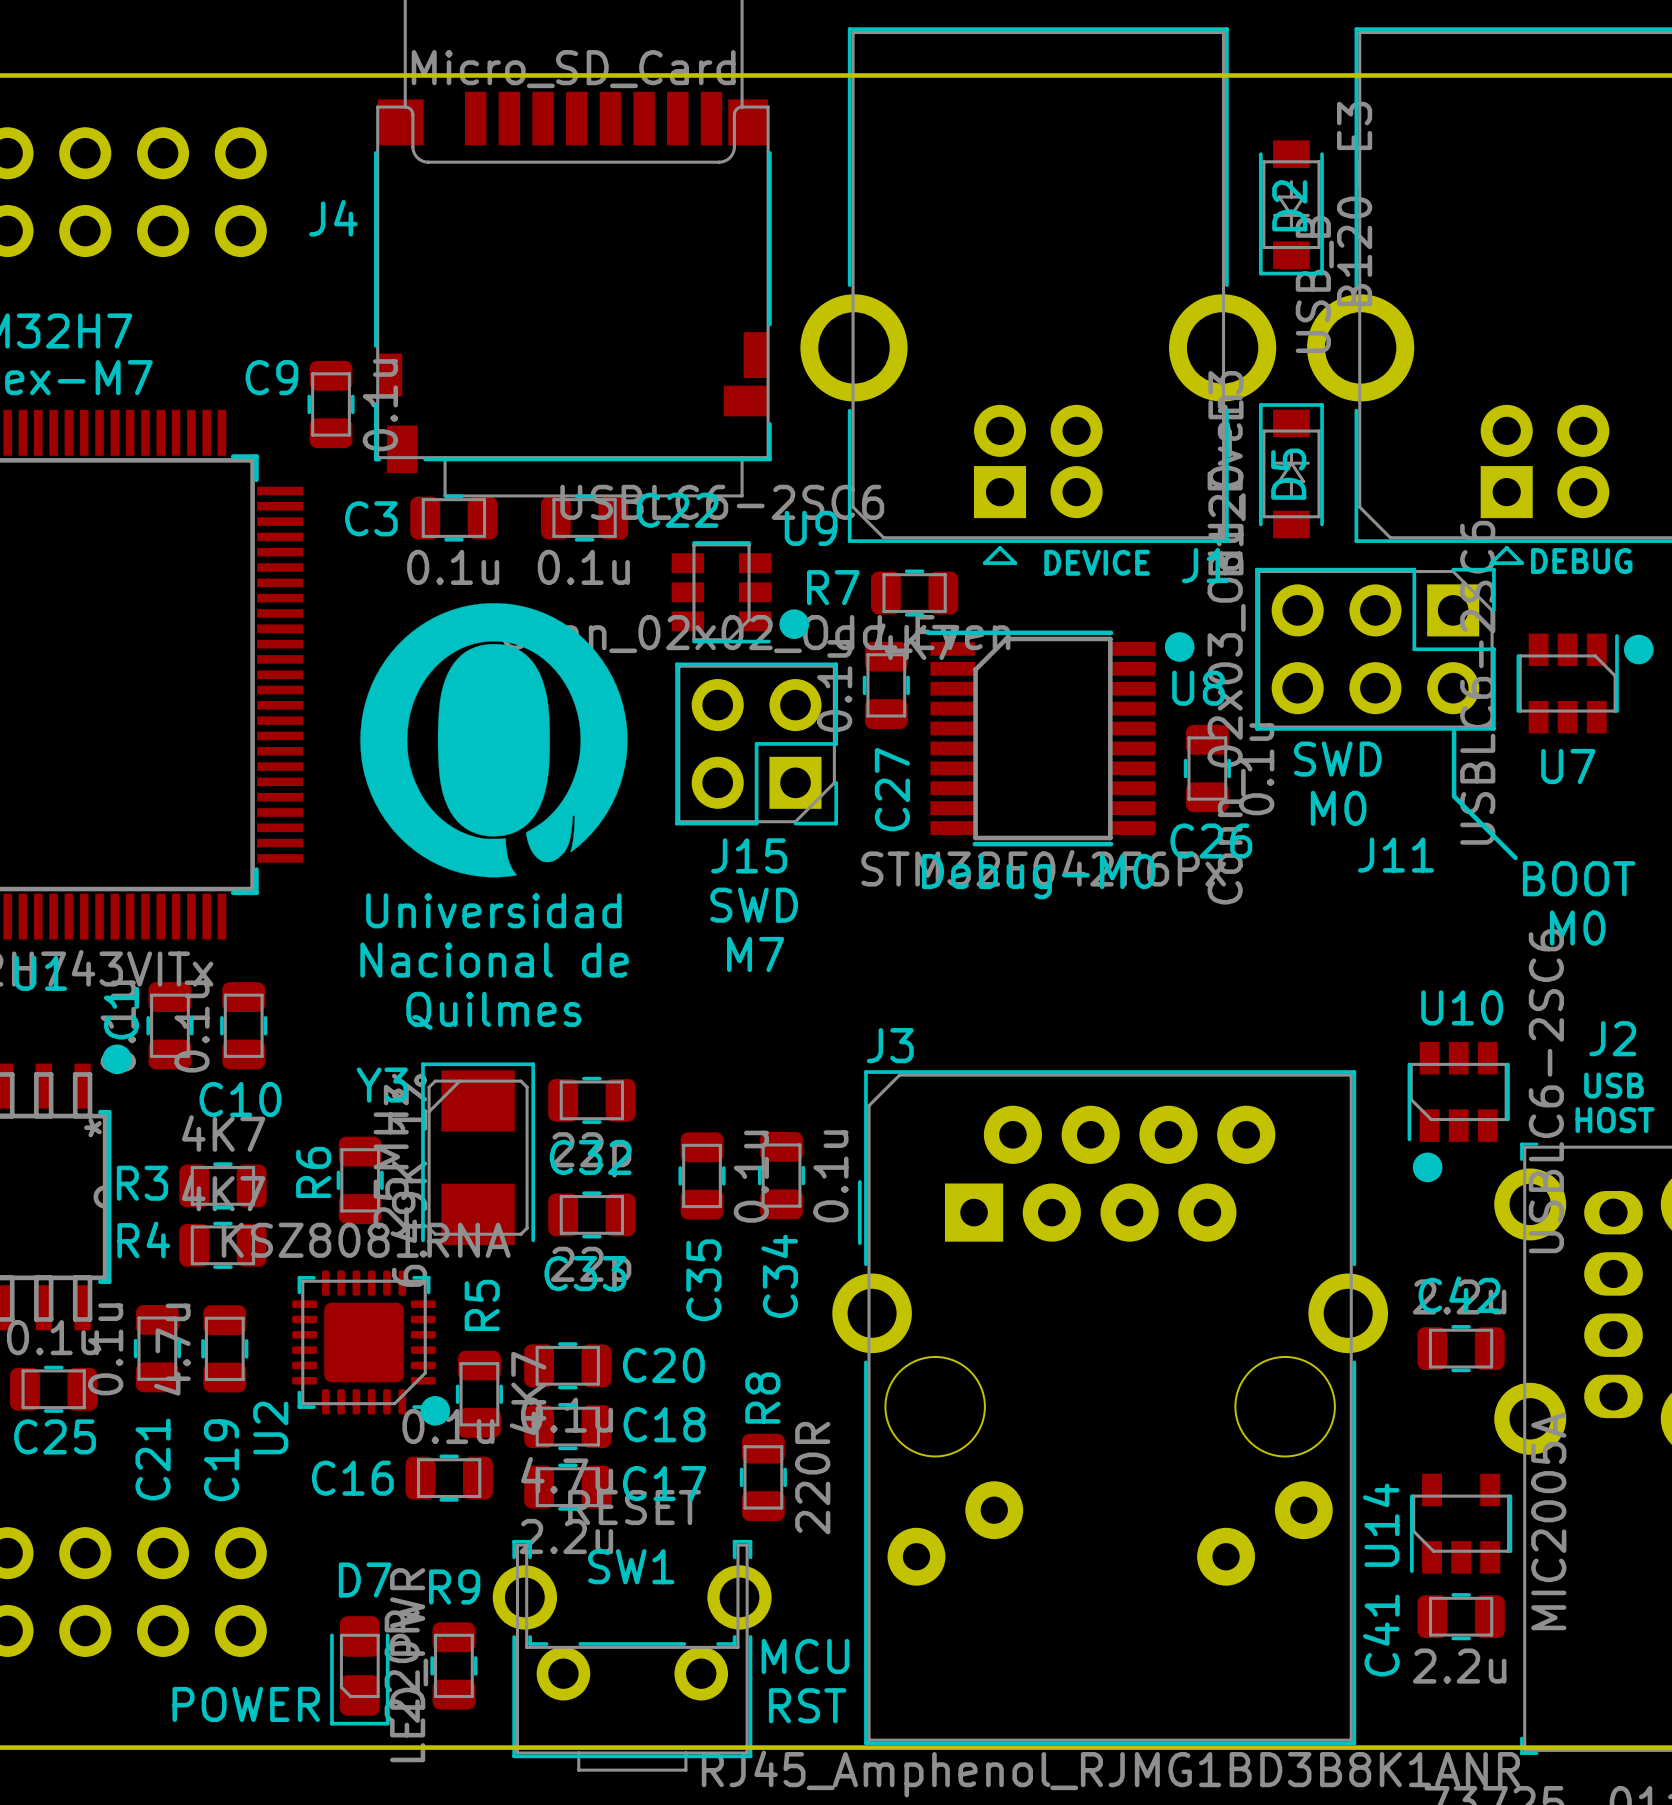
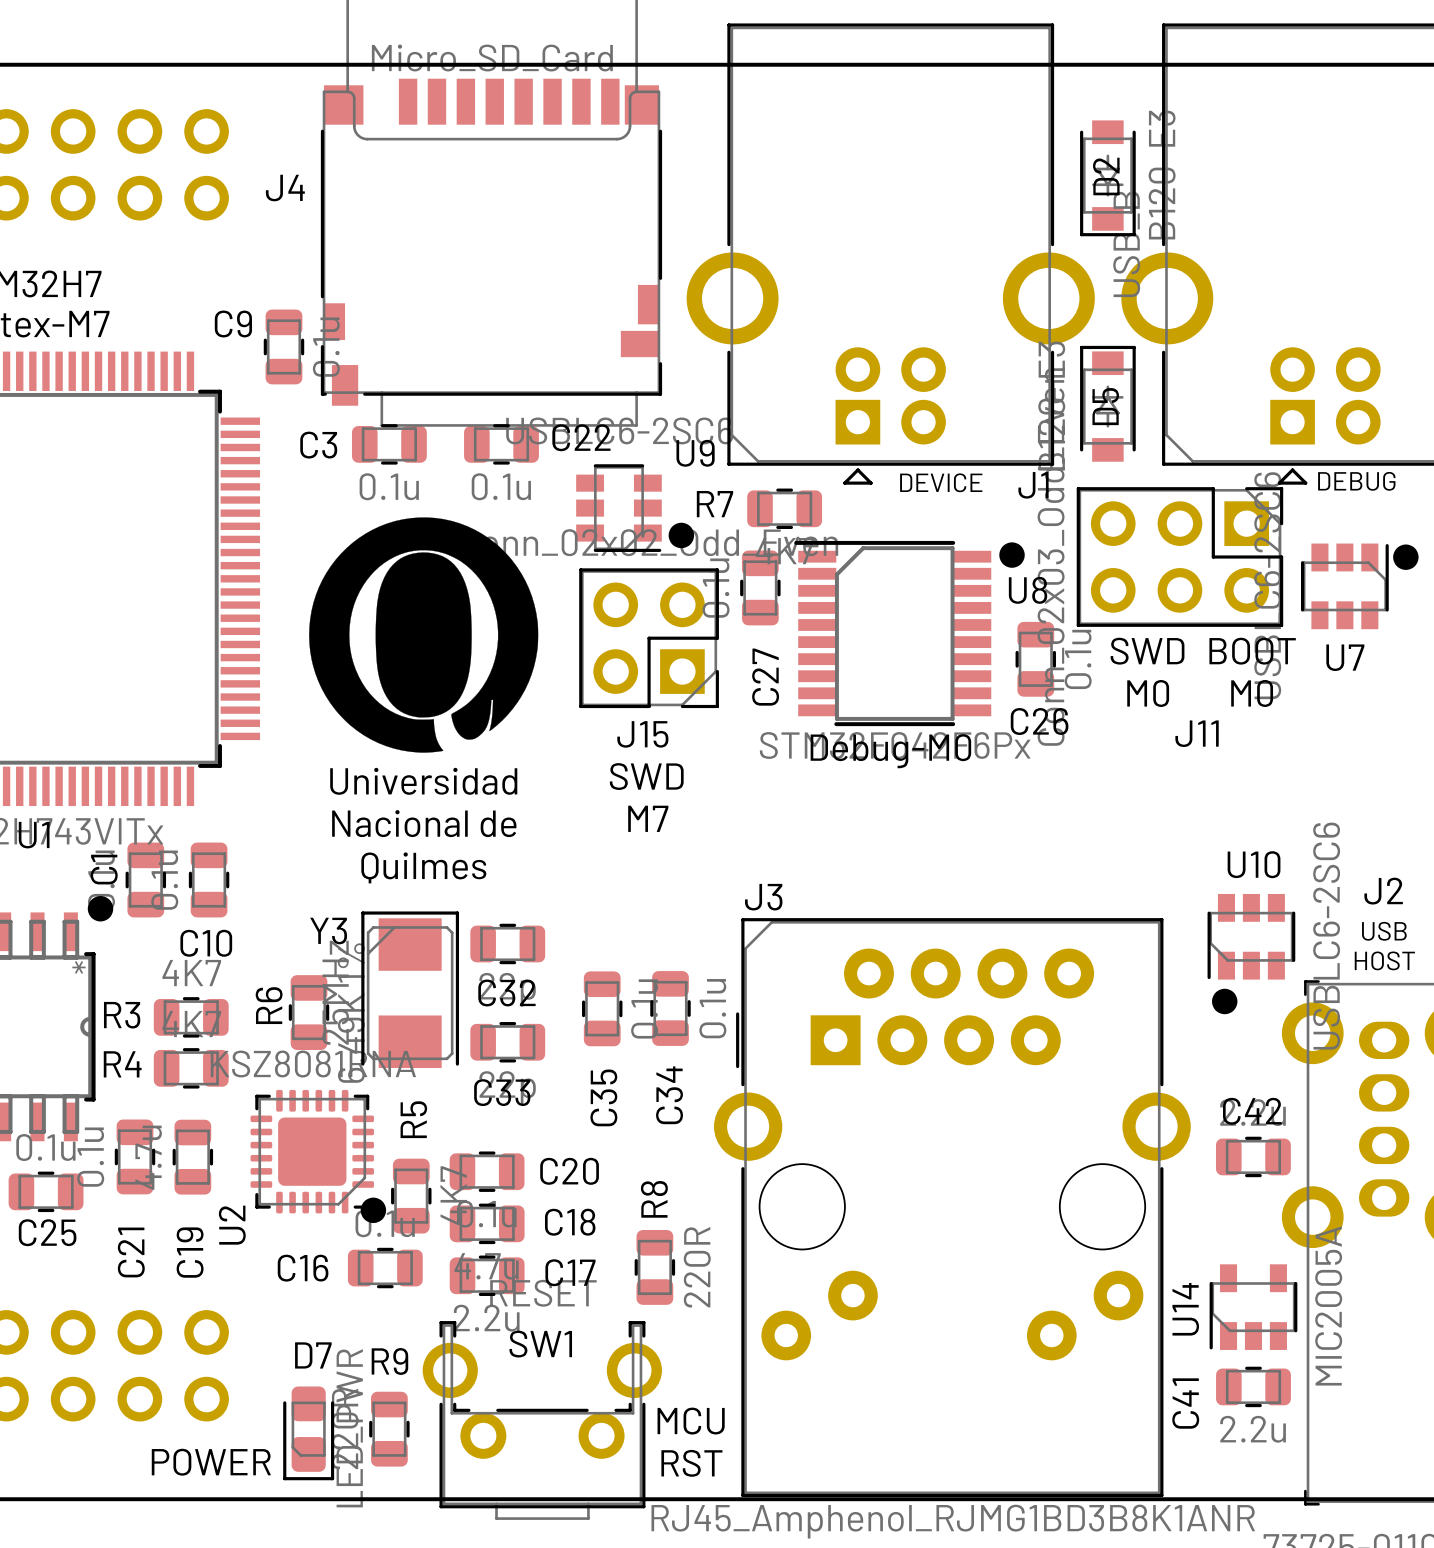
line: (1454, 731) (1454, 796) (1515, 857) -> none
text position: BOOT (1579, 878) -> BOOT (1252, 651)
text position: M0 (1577, 928) -> M0 (1252, 693)

